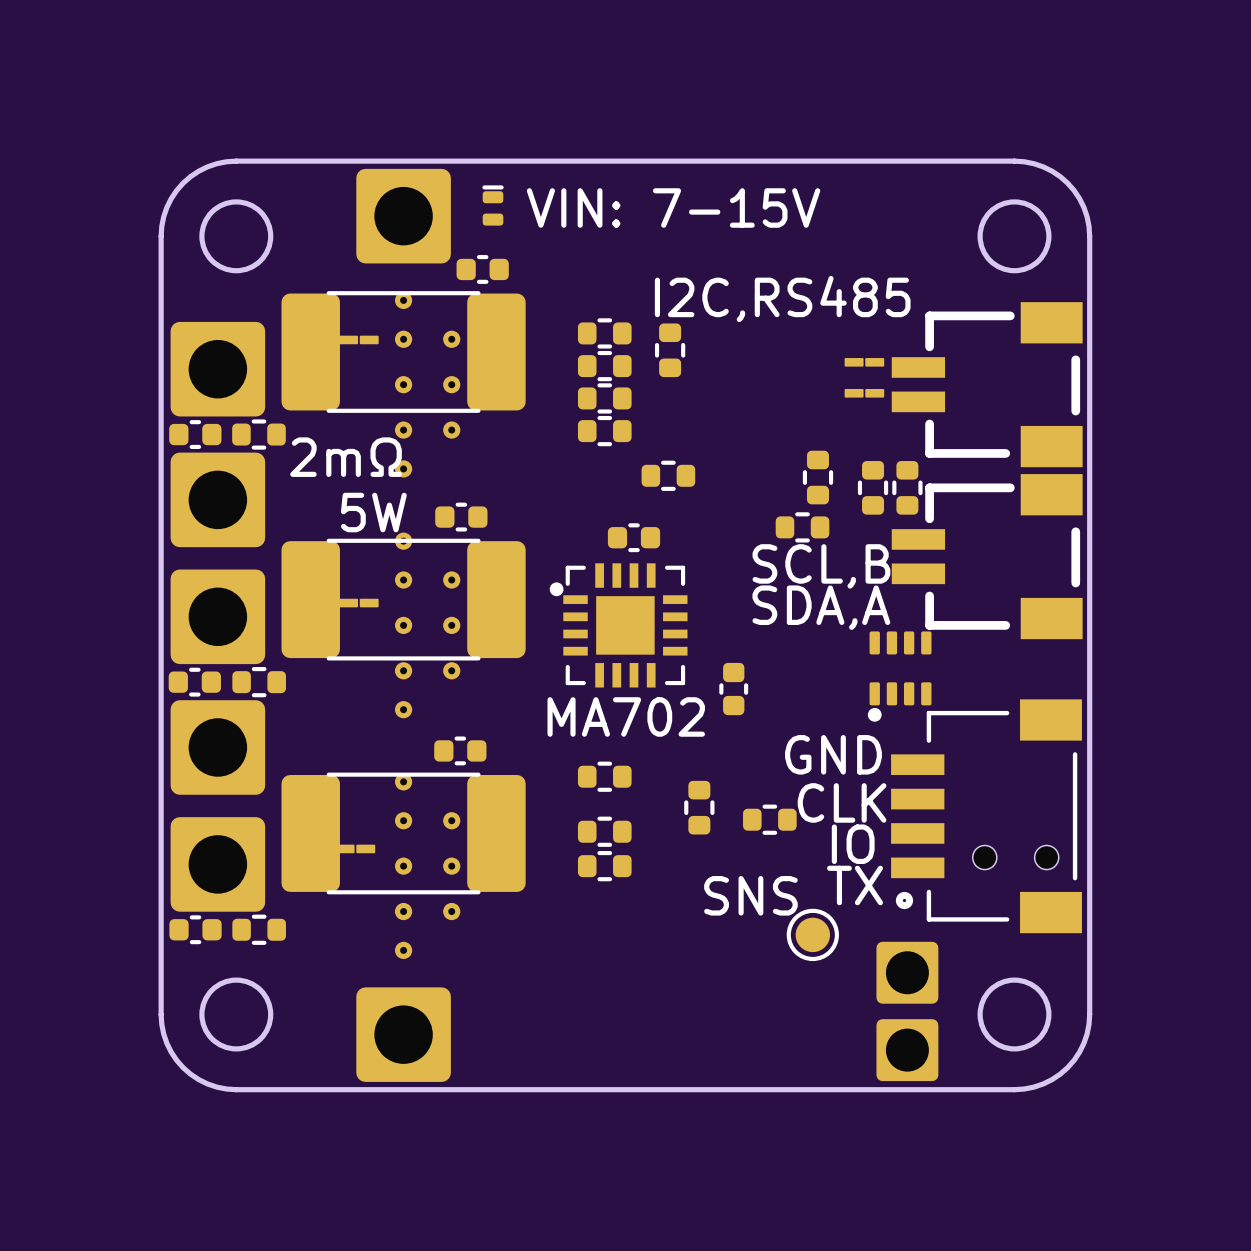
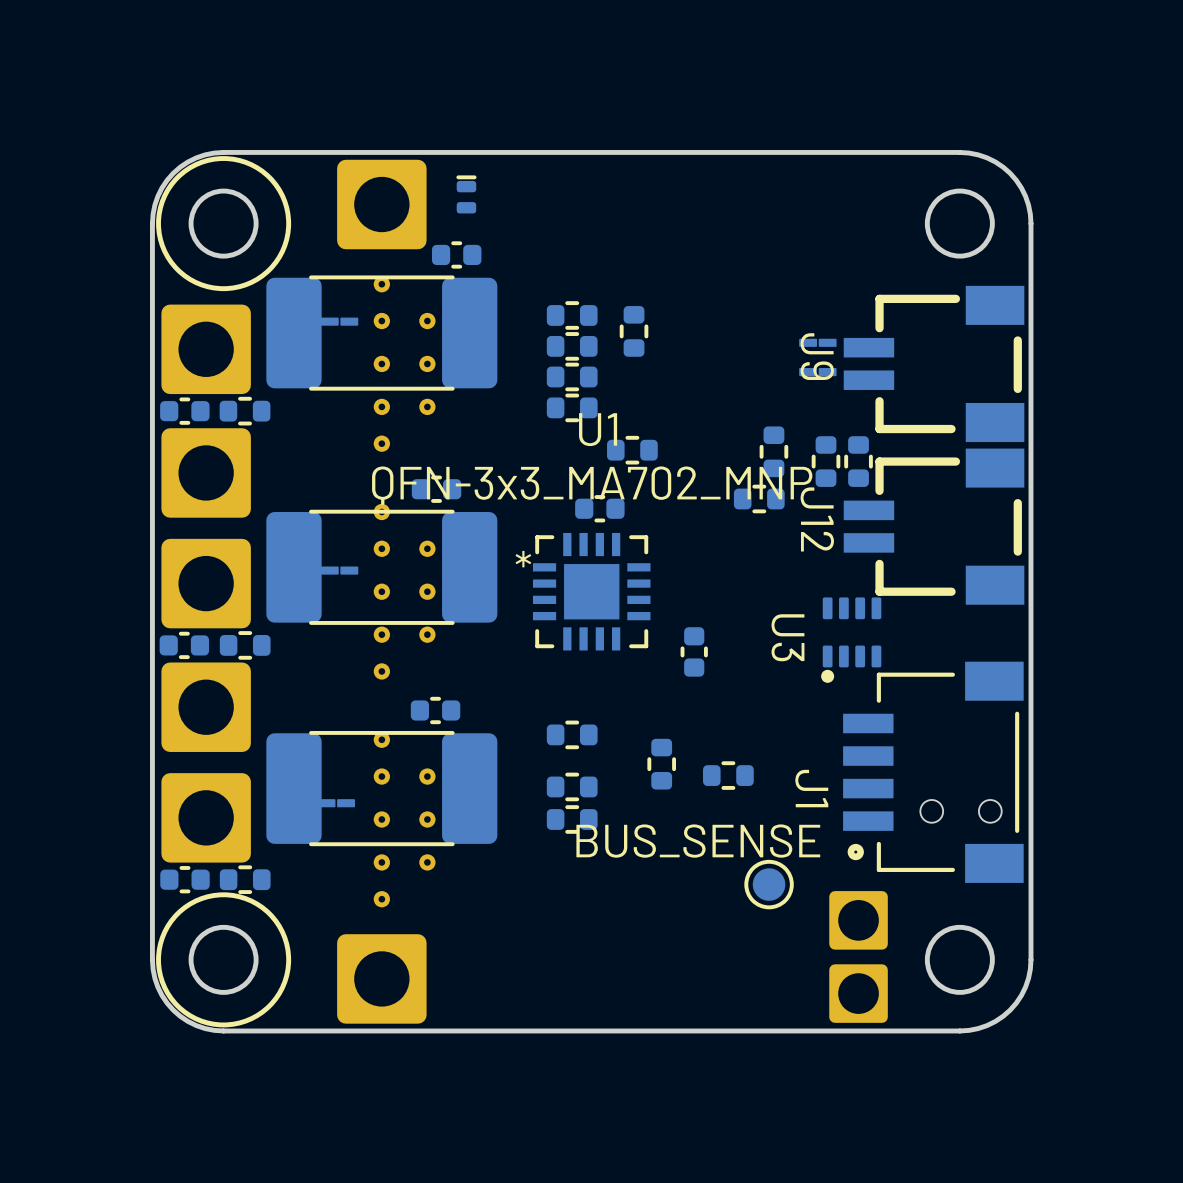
drawing: none -> [156, 156, 292, 292]
text: VIN: 7-15V (673, 207) -> none
text: I2C,RS485 (782, 299) -> none
J9 name: none -> J9 (817, 356)
text: 2mΩ (346, 457) -> none
text: 5W (373, 512) -> none
J12 name: none -> J12 (817, 519)
text: SCL,B (821, 566) -> none
text: SDA,A (821, 607) -> none
part: MA702 (618, 625) -> none
U1: none -> QFN-3x3_MA702_MNP (591, 591)
U3 name: none -> U3 (787, 637)
text: GND (833, 754) -> none
text: CLK (842, 802) -> none
J1 name: none -> J1 (811, 788)
text: IO (853, 844) -> none
text: TX (855, 885) -> none
SNS name: SNS (750, 895) -> BUS_SENSE (698, 841)
drawing: none -> [156, 892, 292, 1028]

